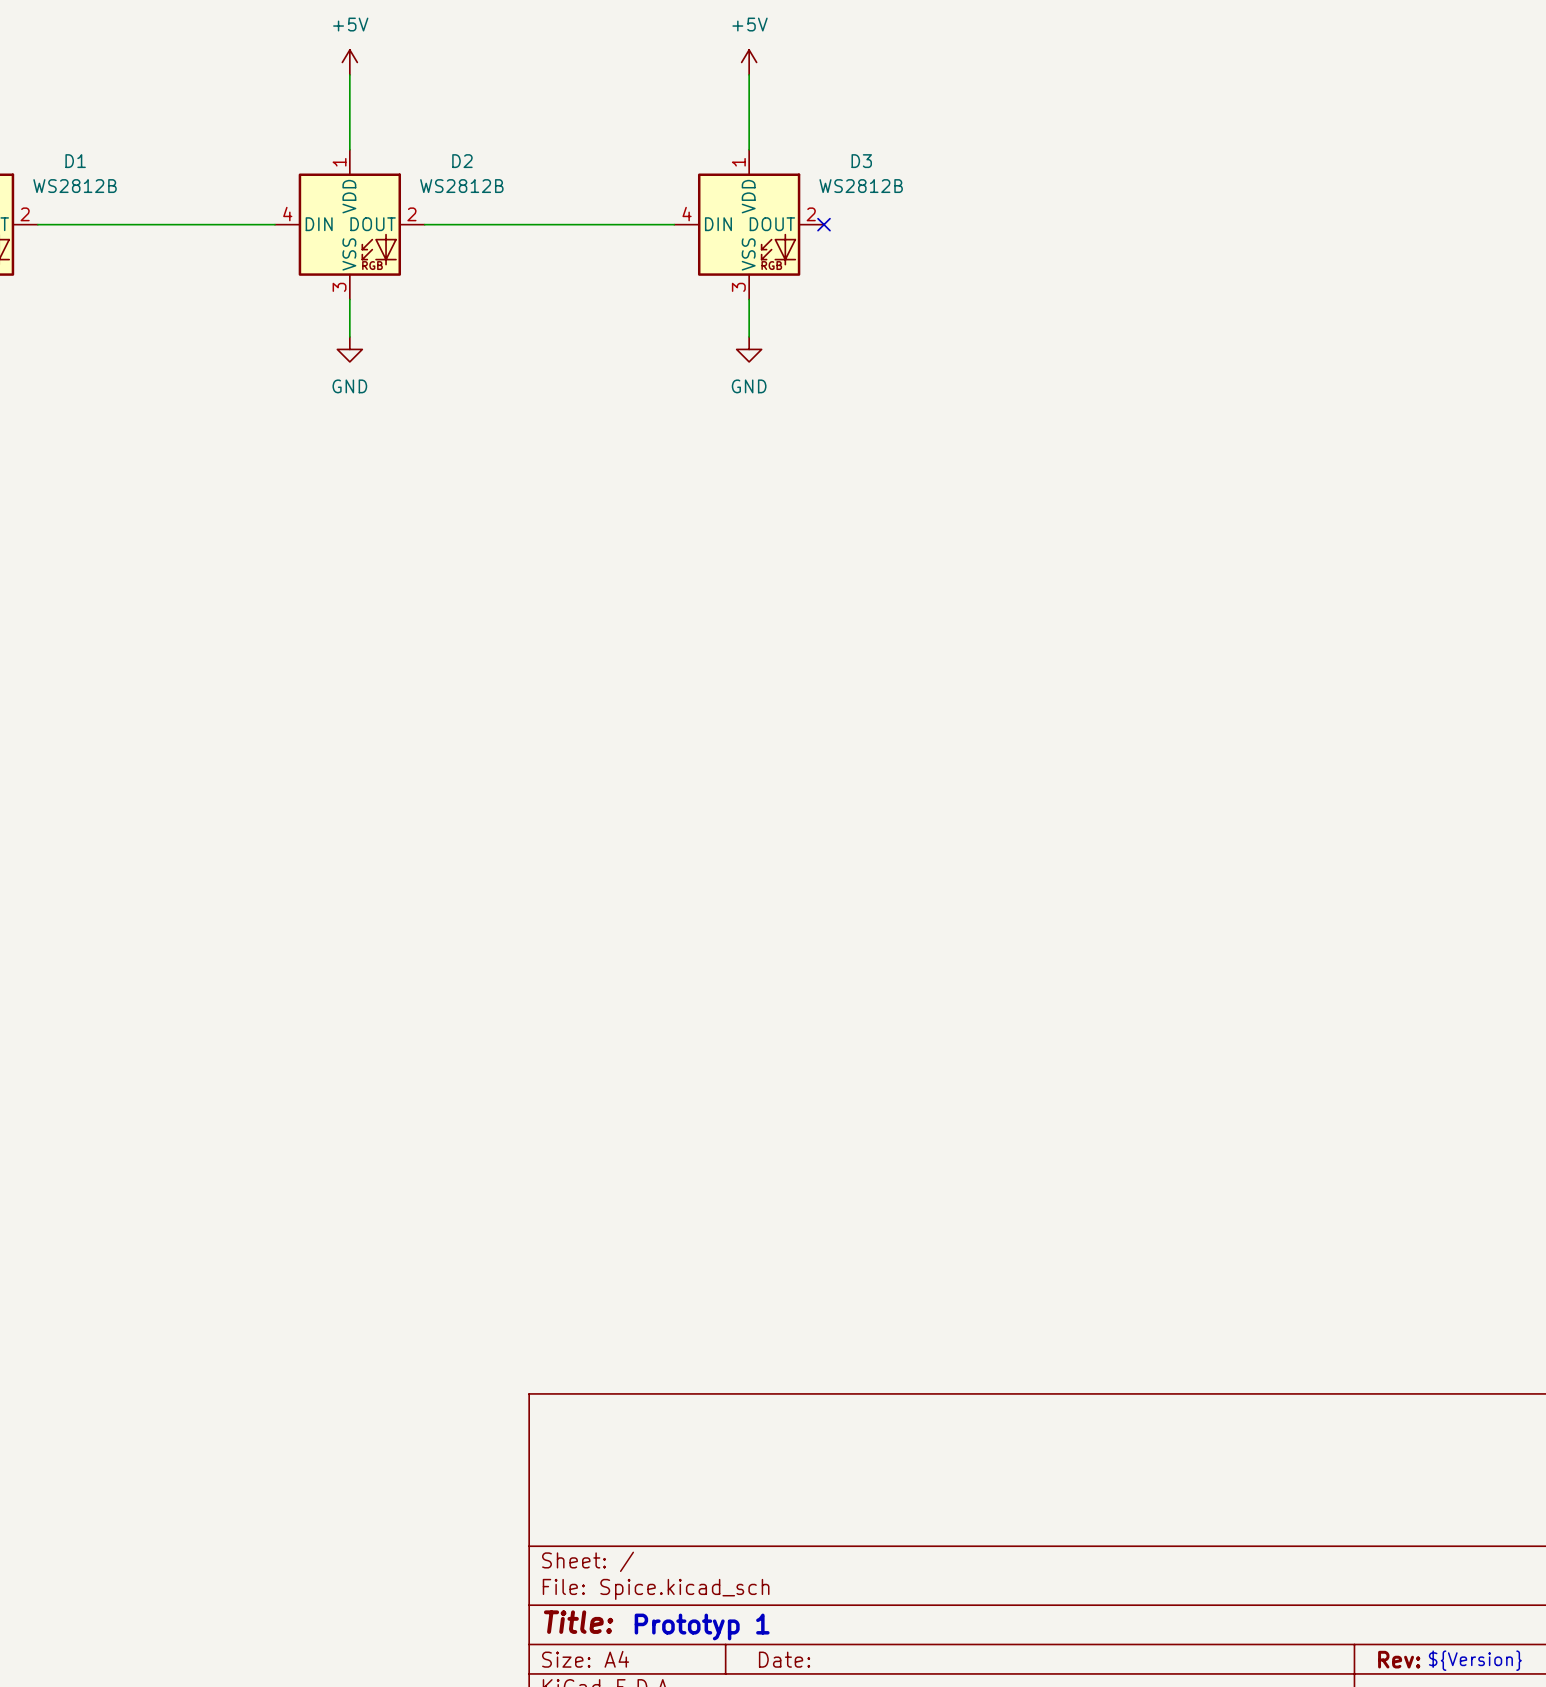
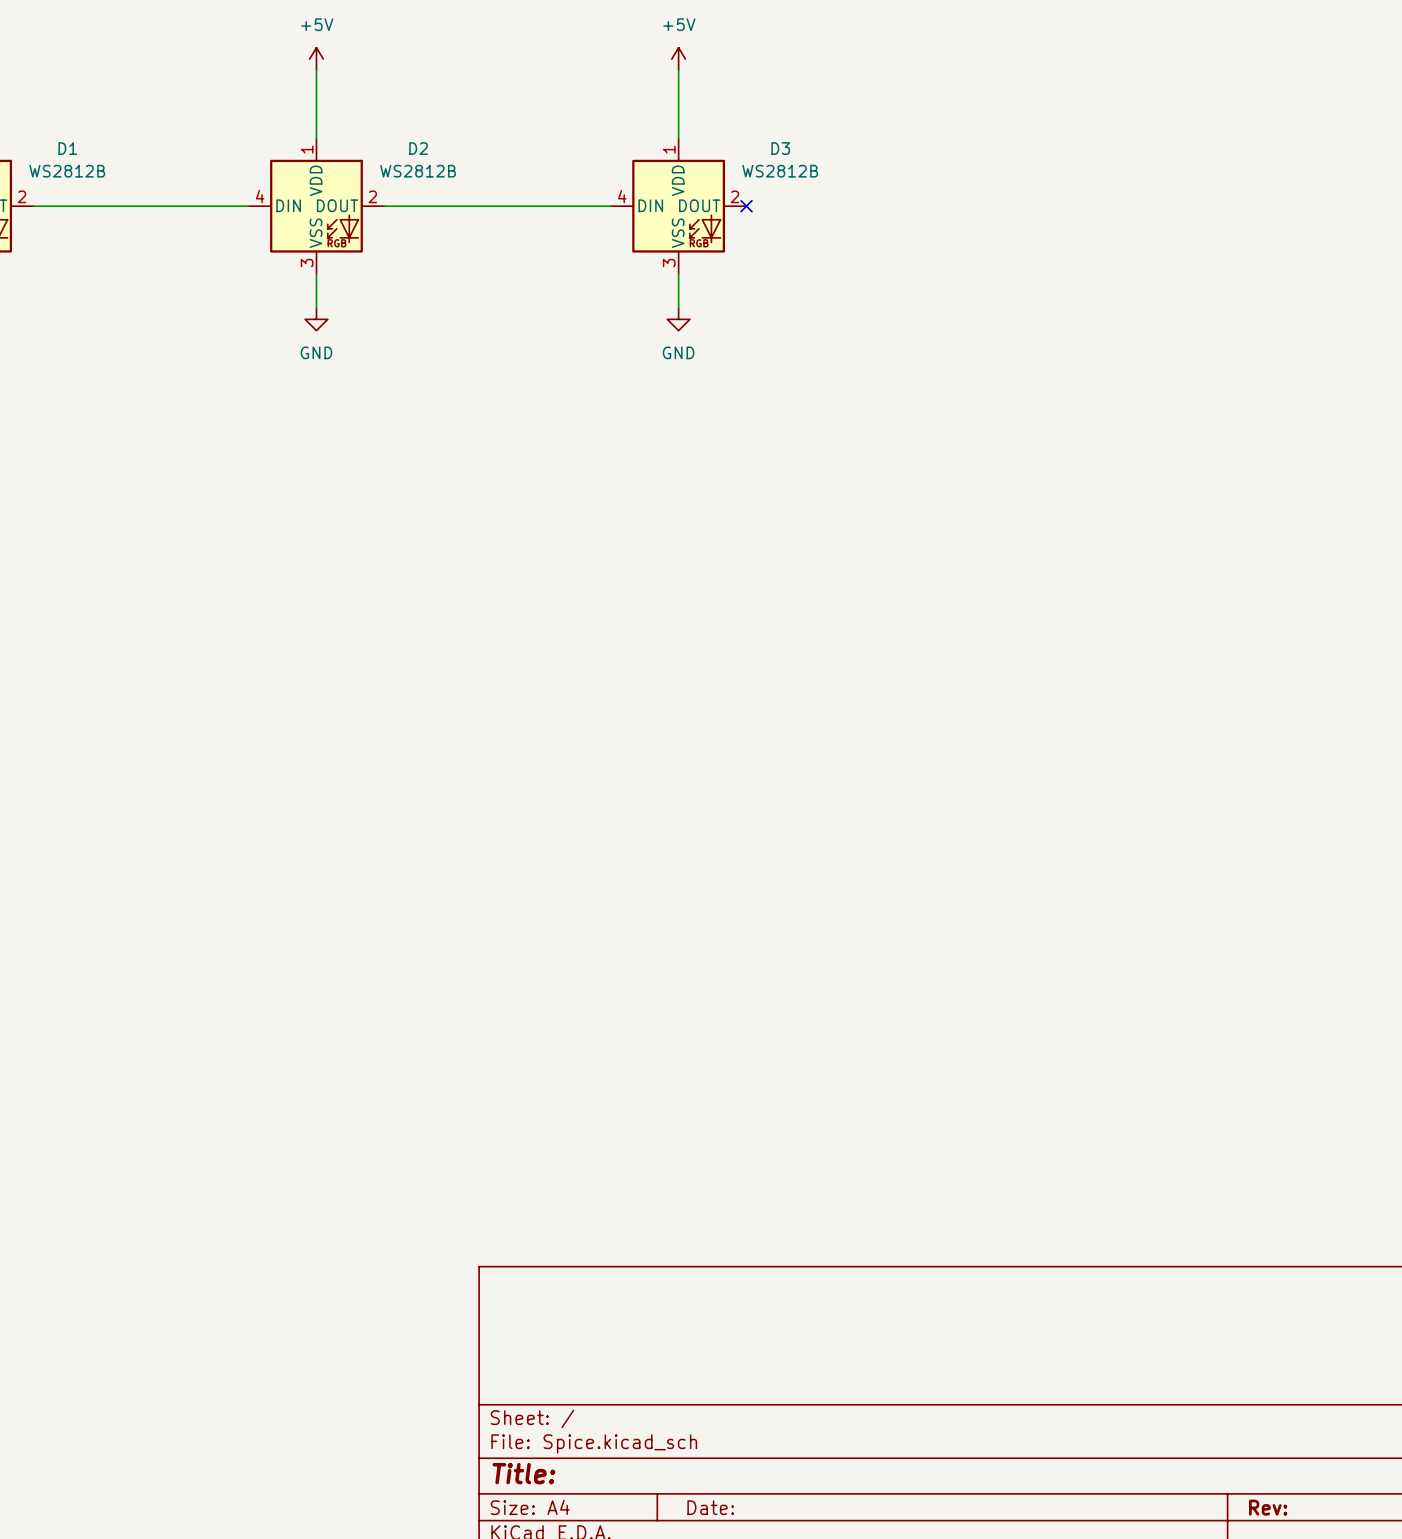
text: Prototyp 1 (702, 1626) -> none
text: ${Version} (1475, 1660) -> none

